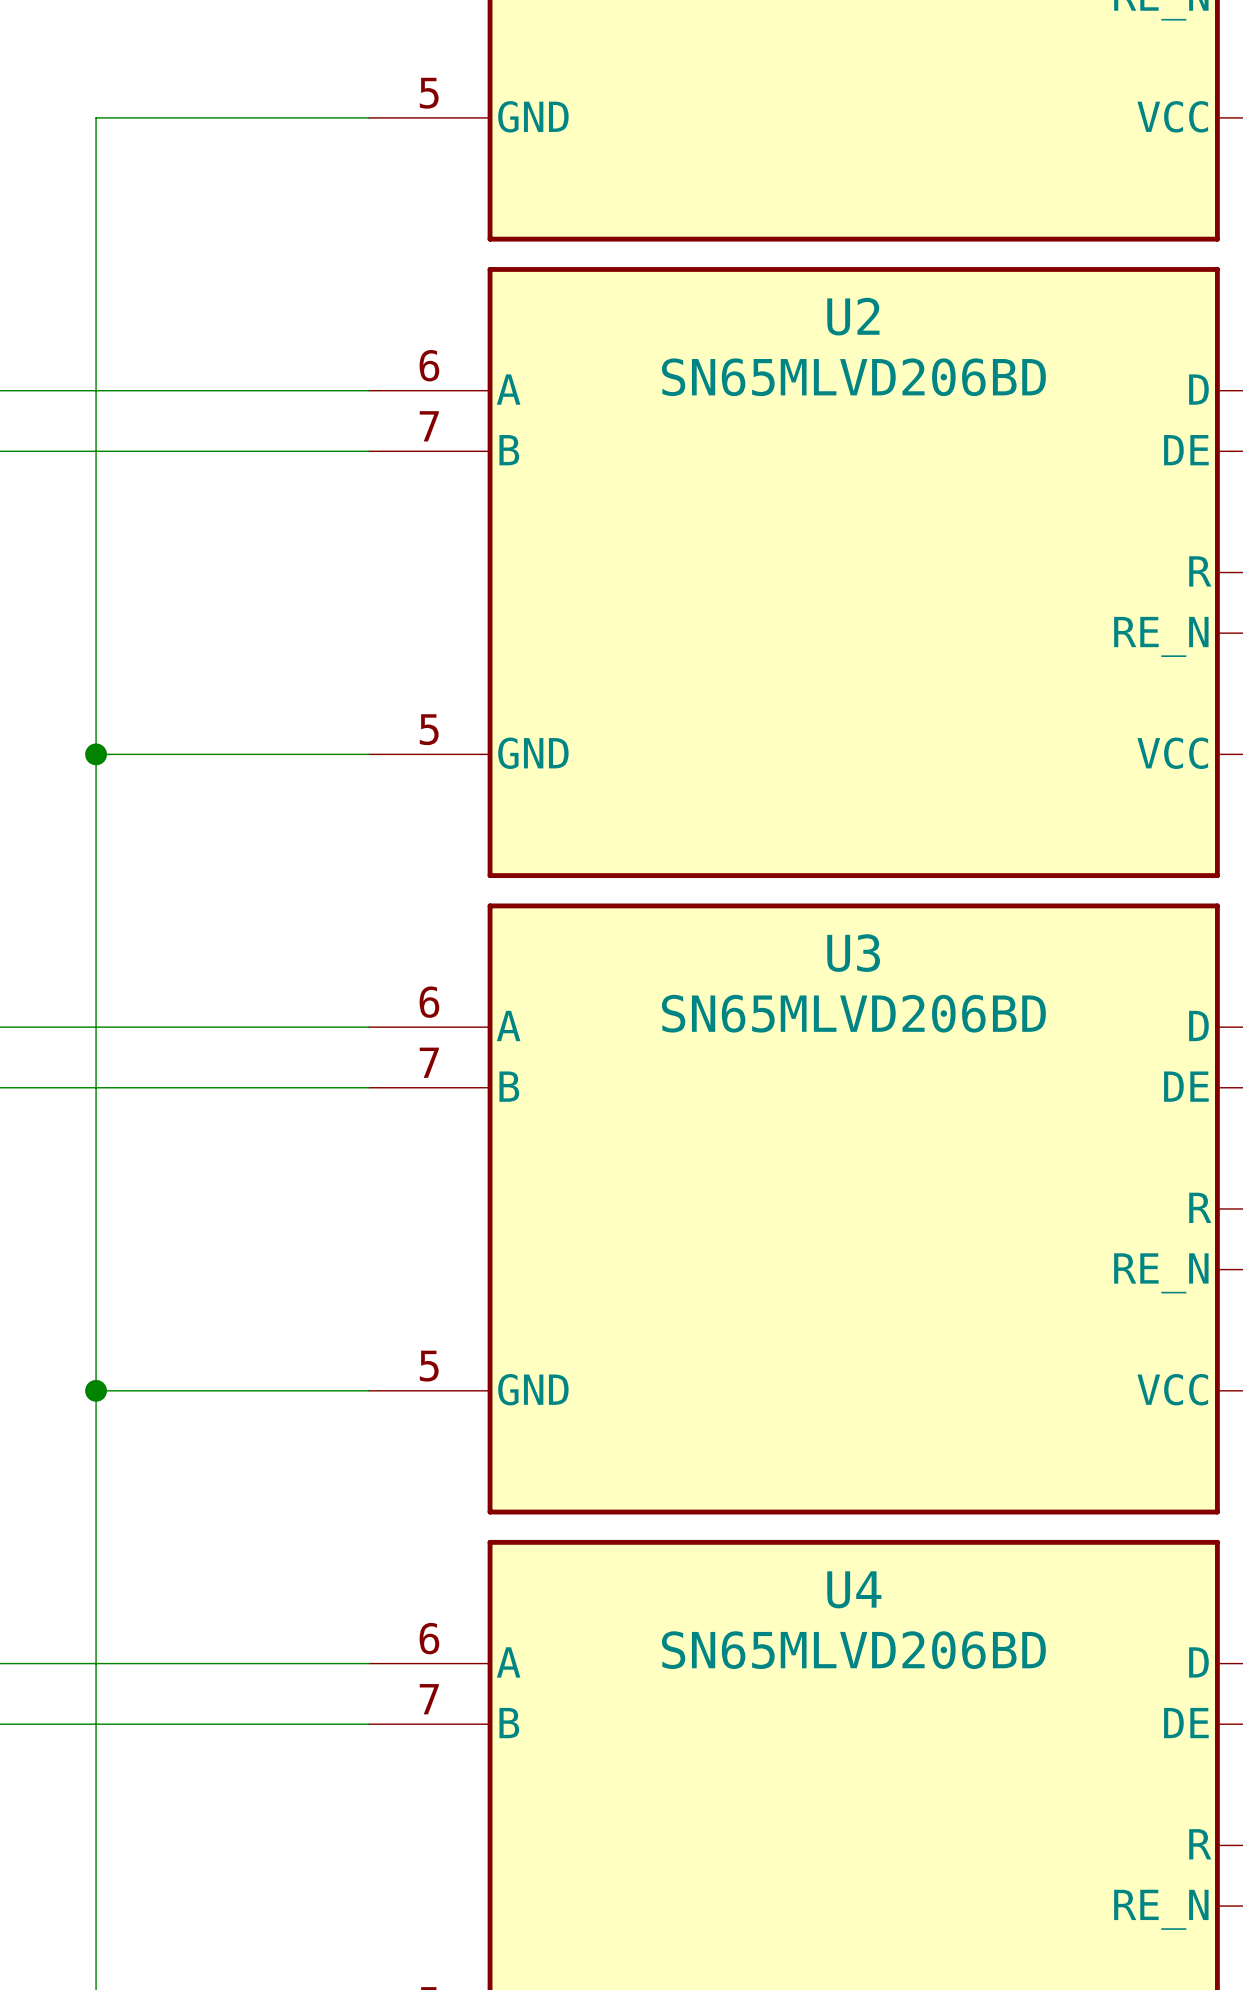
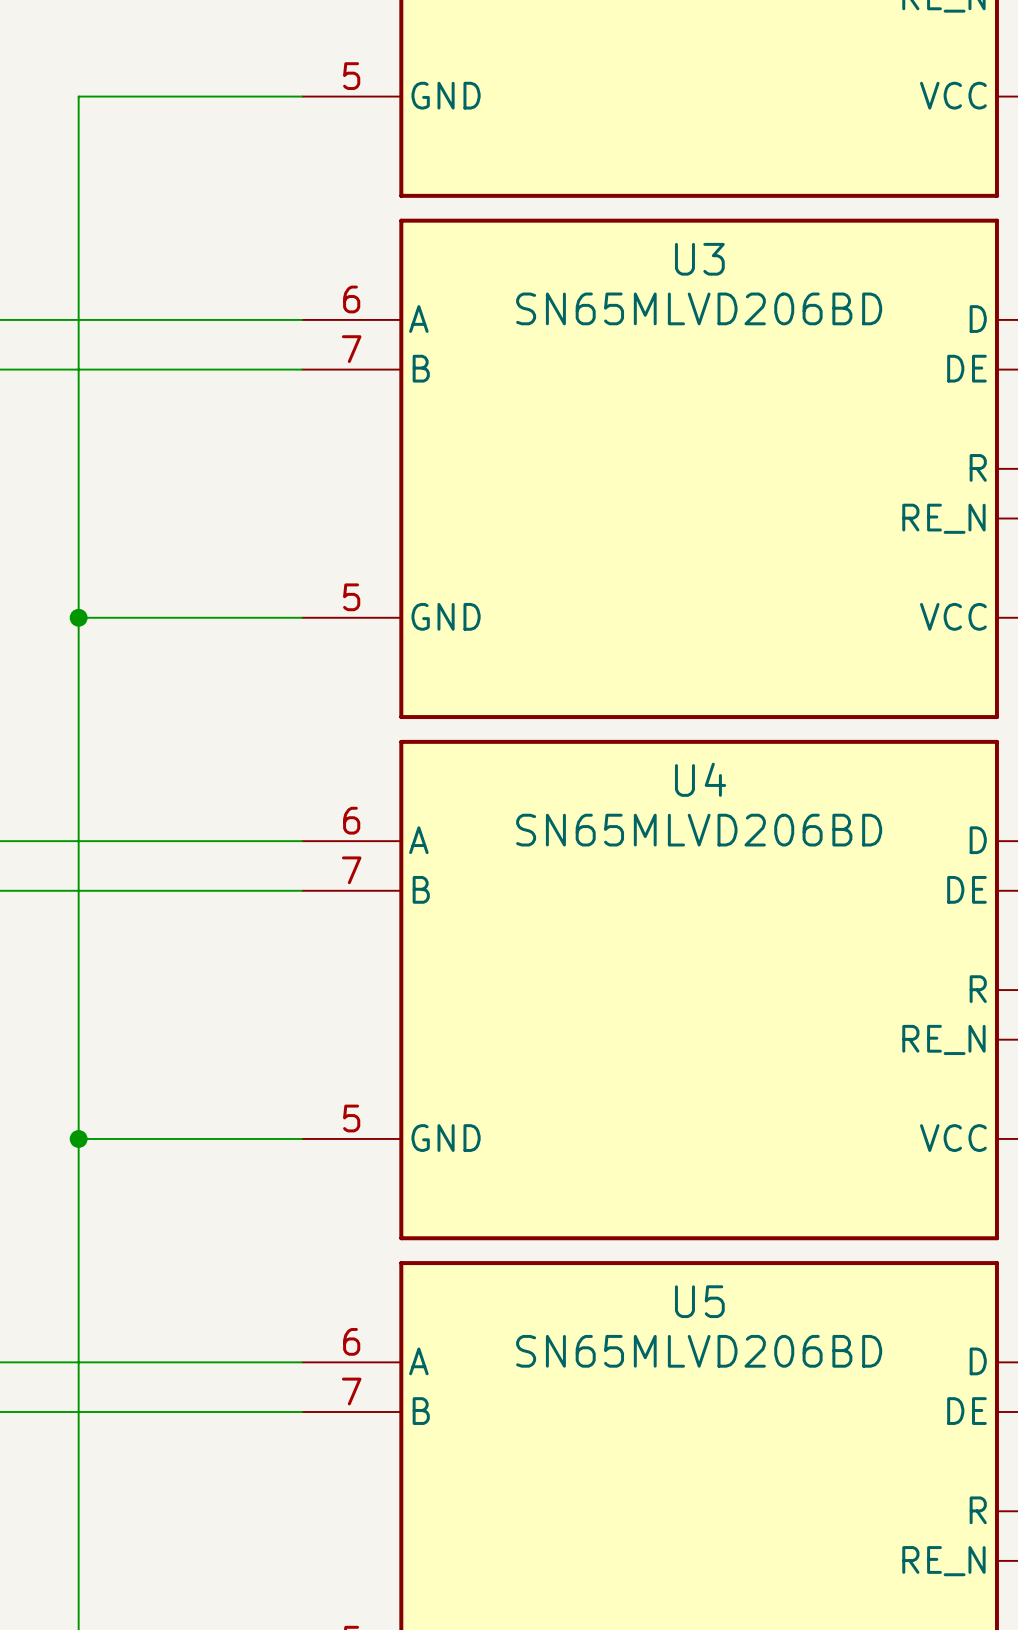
U2 name: U2 (853, 316) -> U3 (699, 259)
U3 name: U3 (853, 953) -> U4 (700, 779)
U4 name: U4 (854, 1589) -> U5 (699, 1301)

